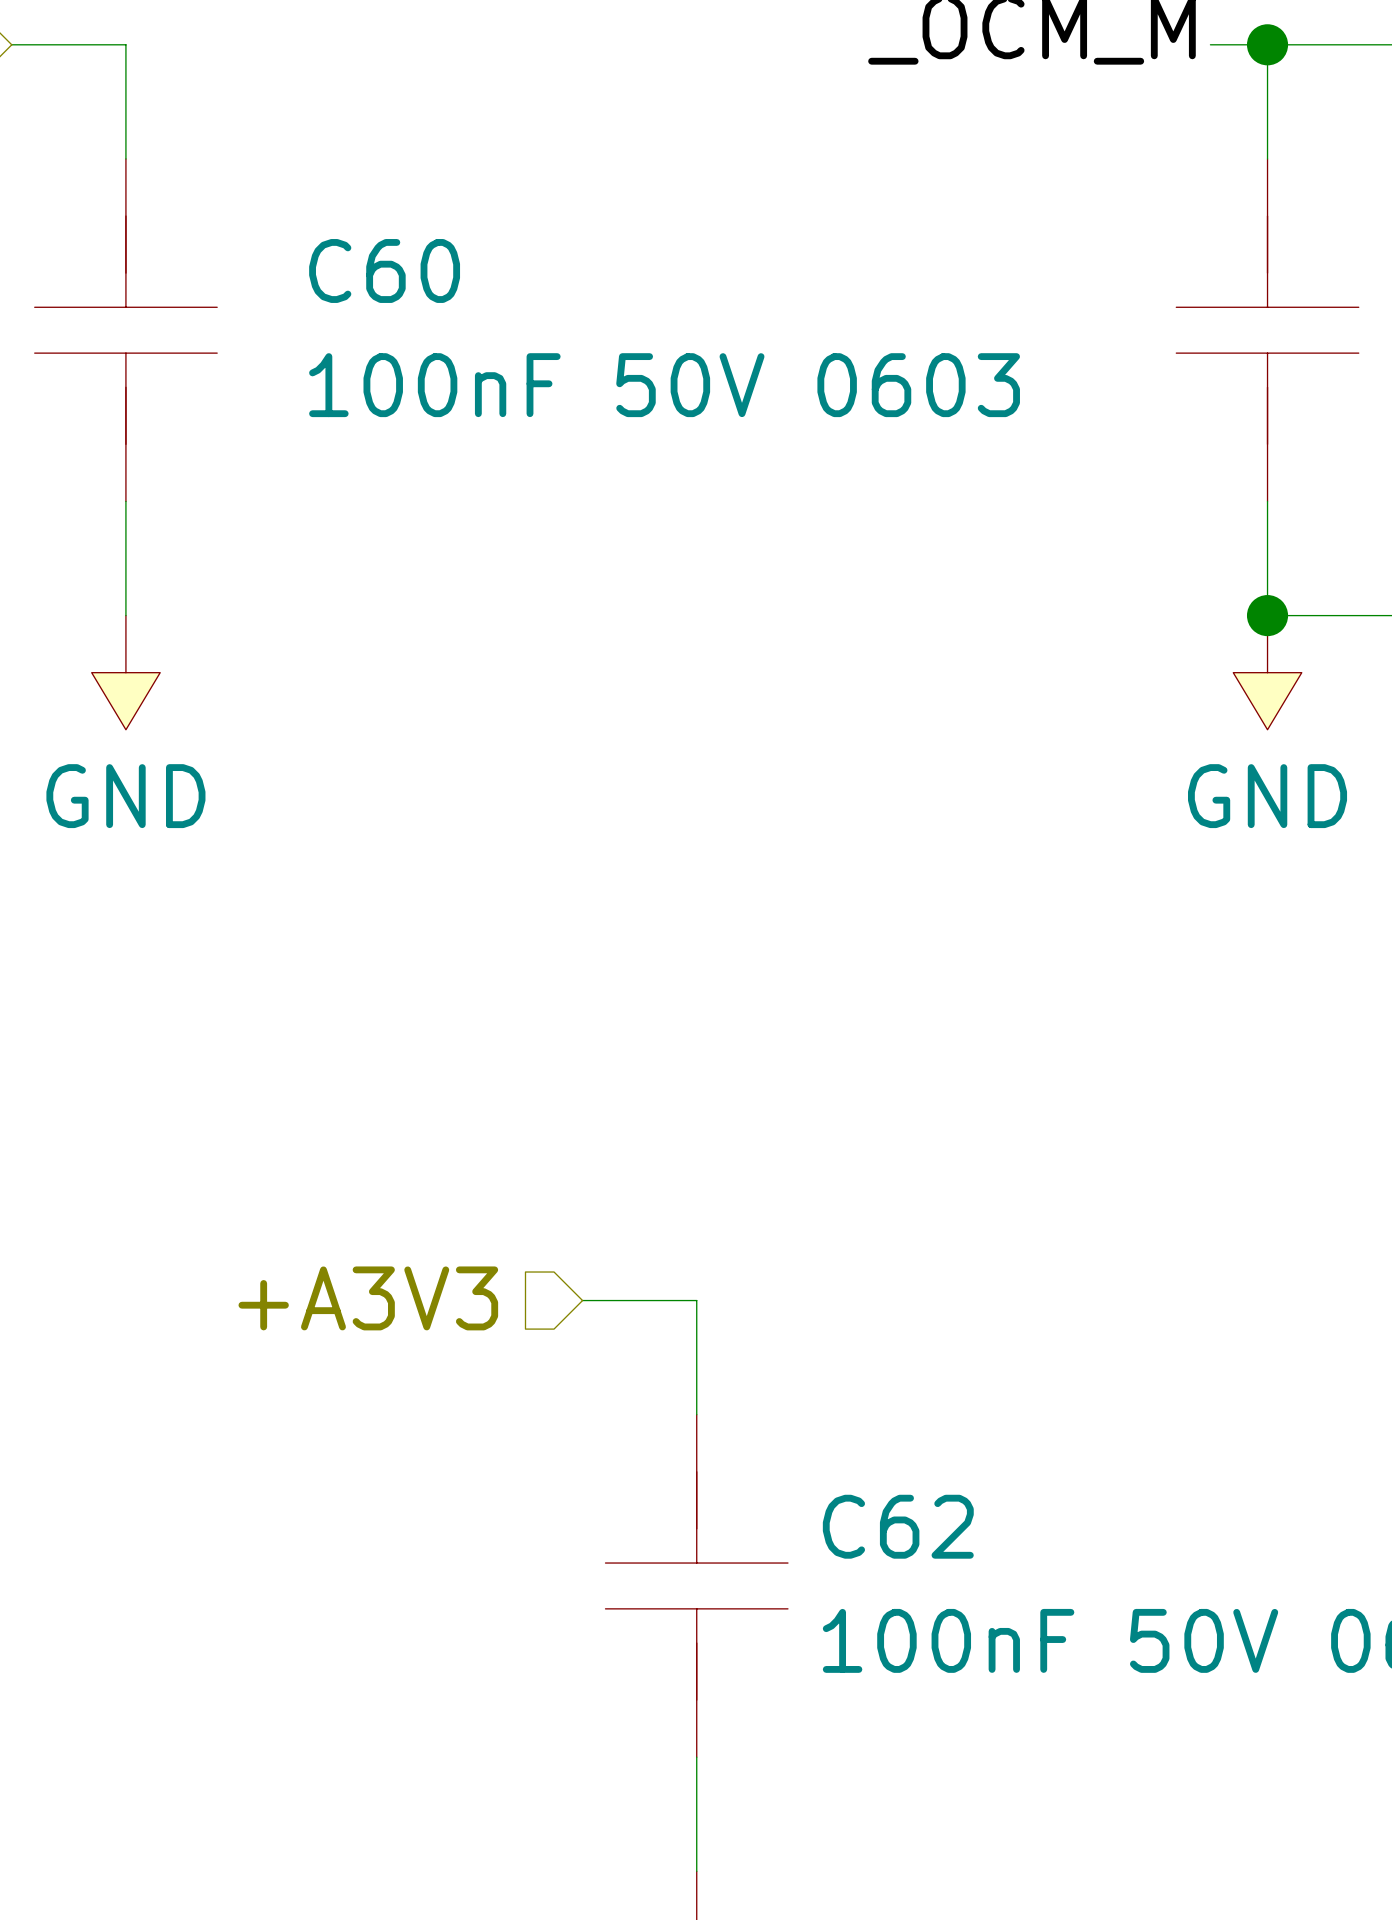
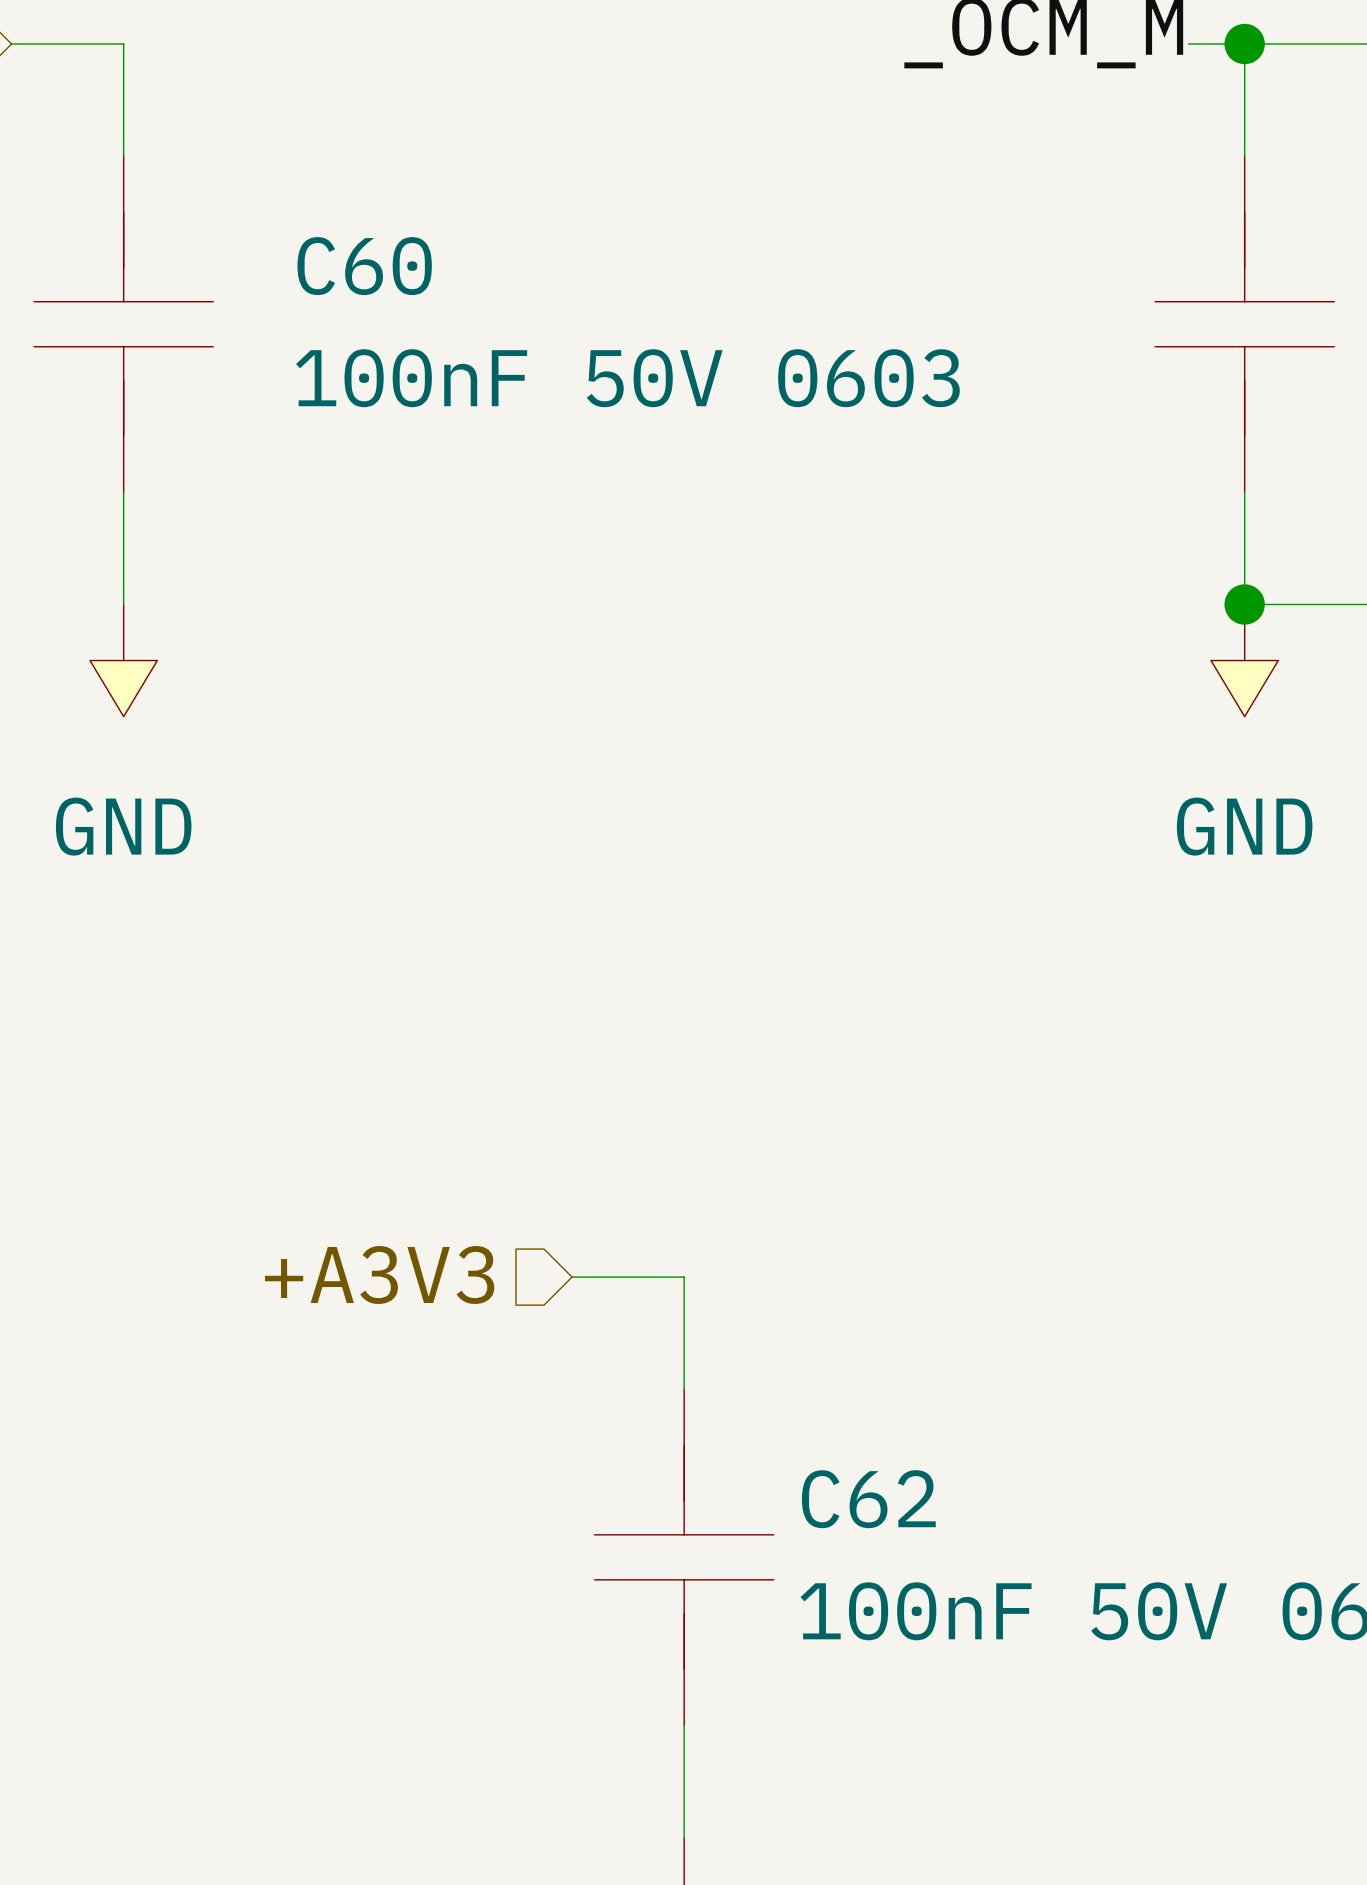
power symbol text position: GND (125, 796) -> GND (123, 826)
power symbol text position: GND (1267, 796) -> GND (1244, 826)

